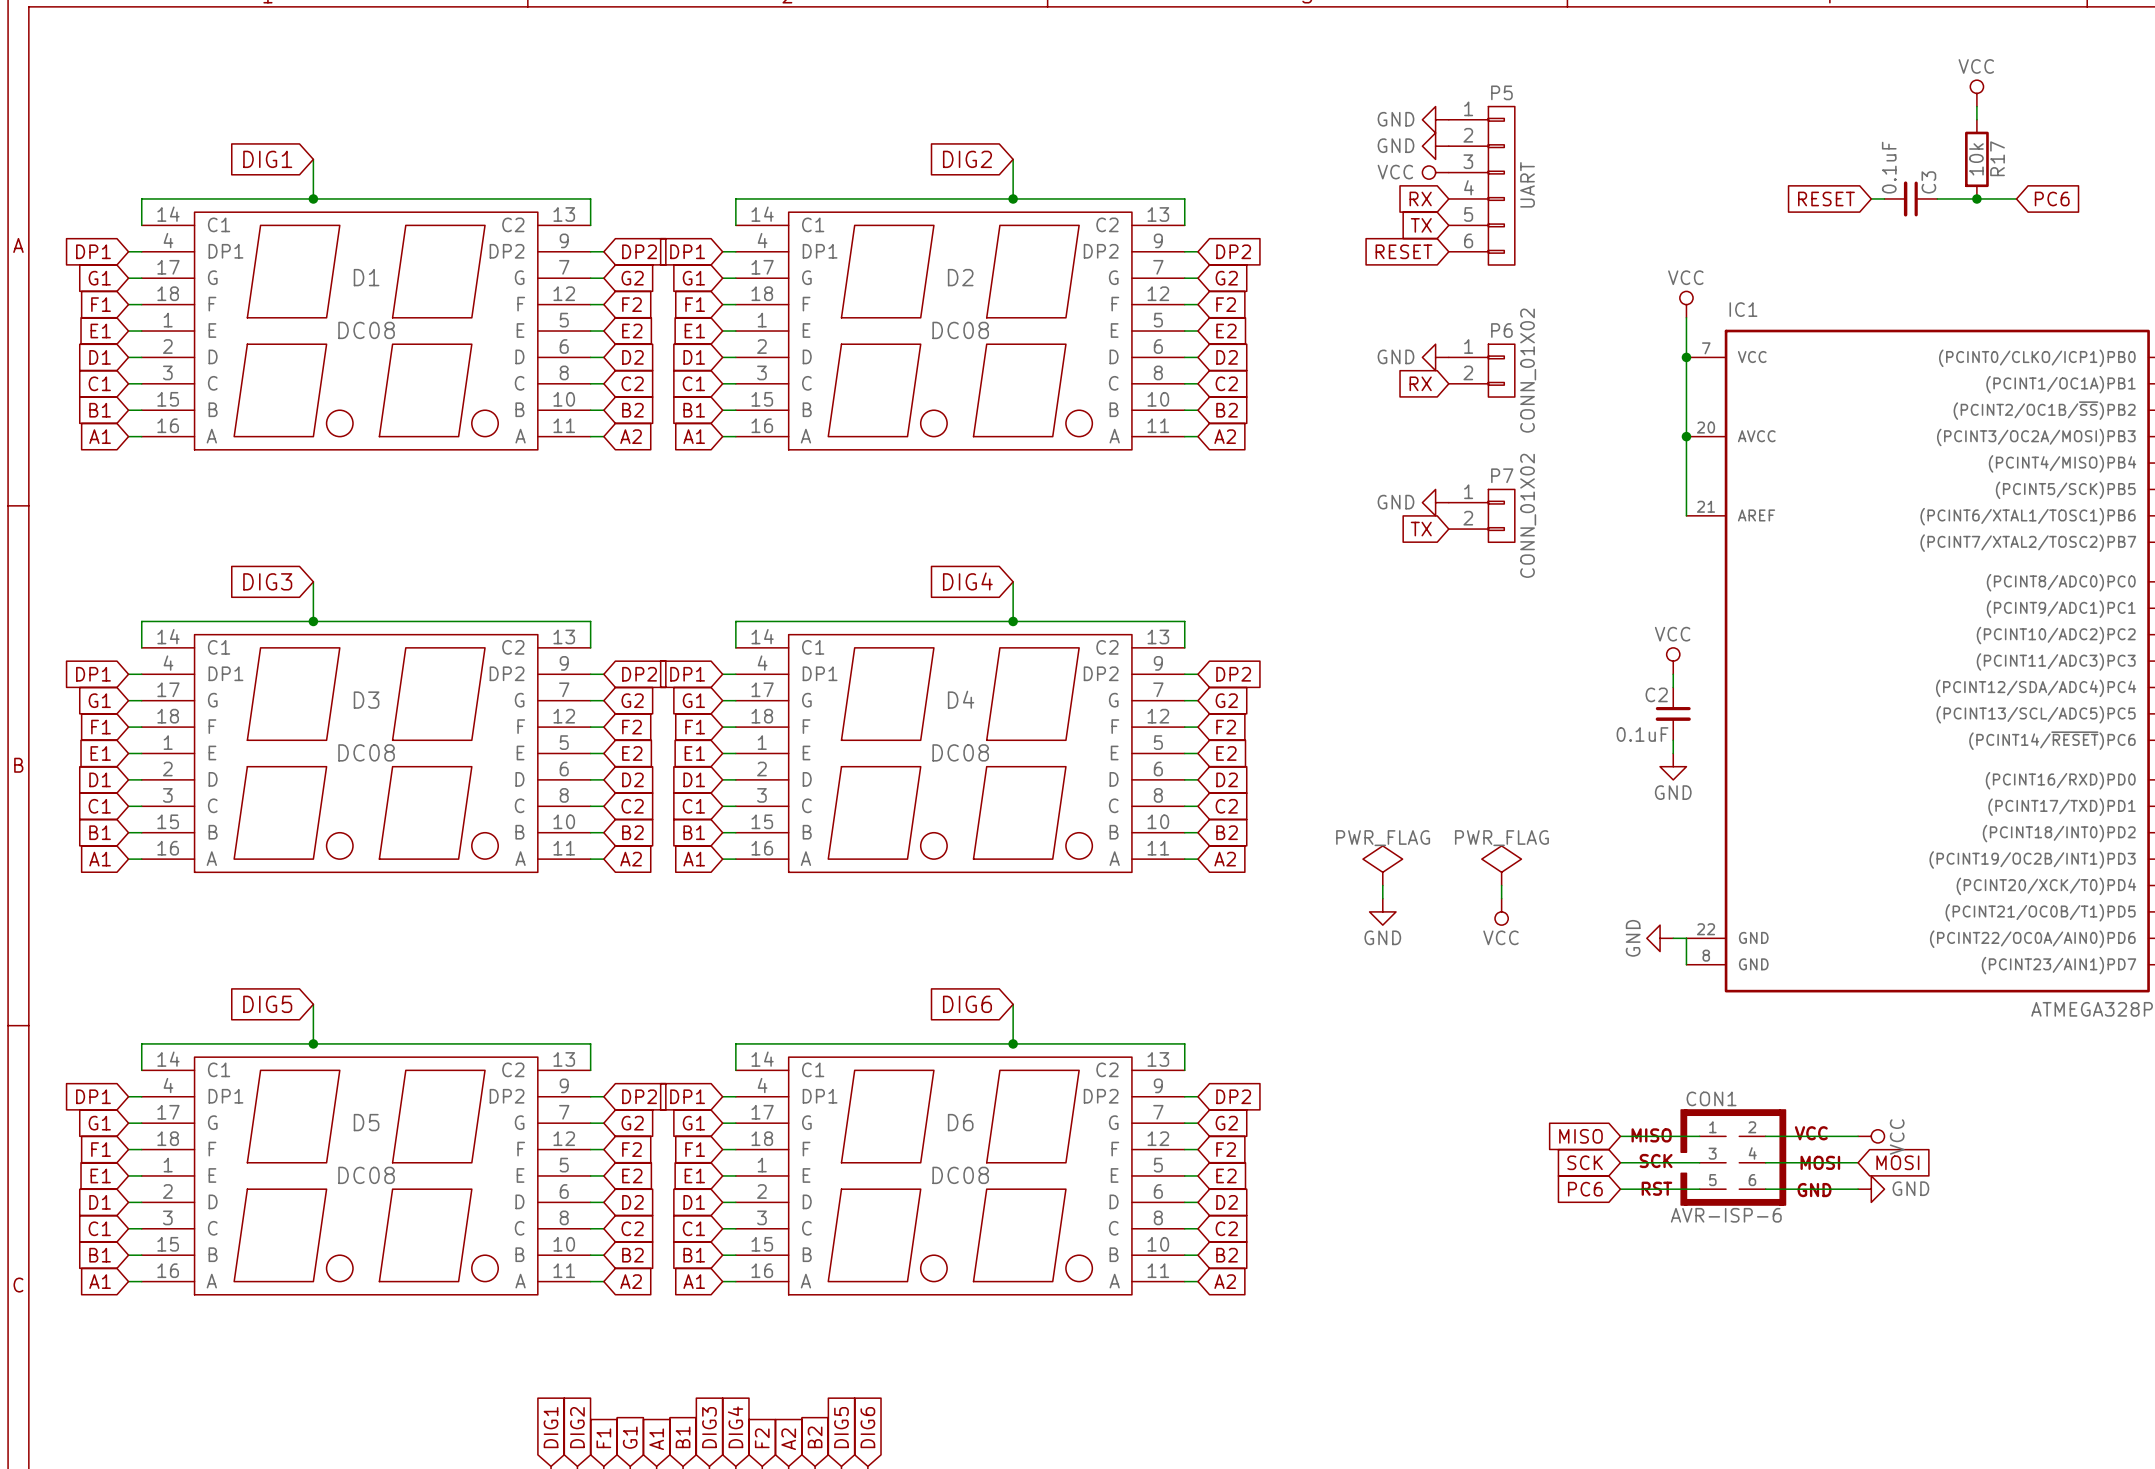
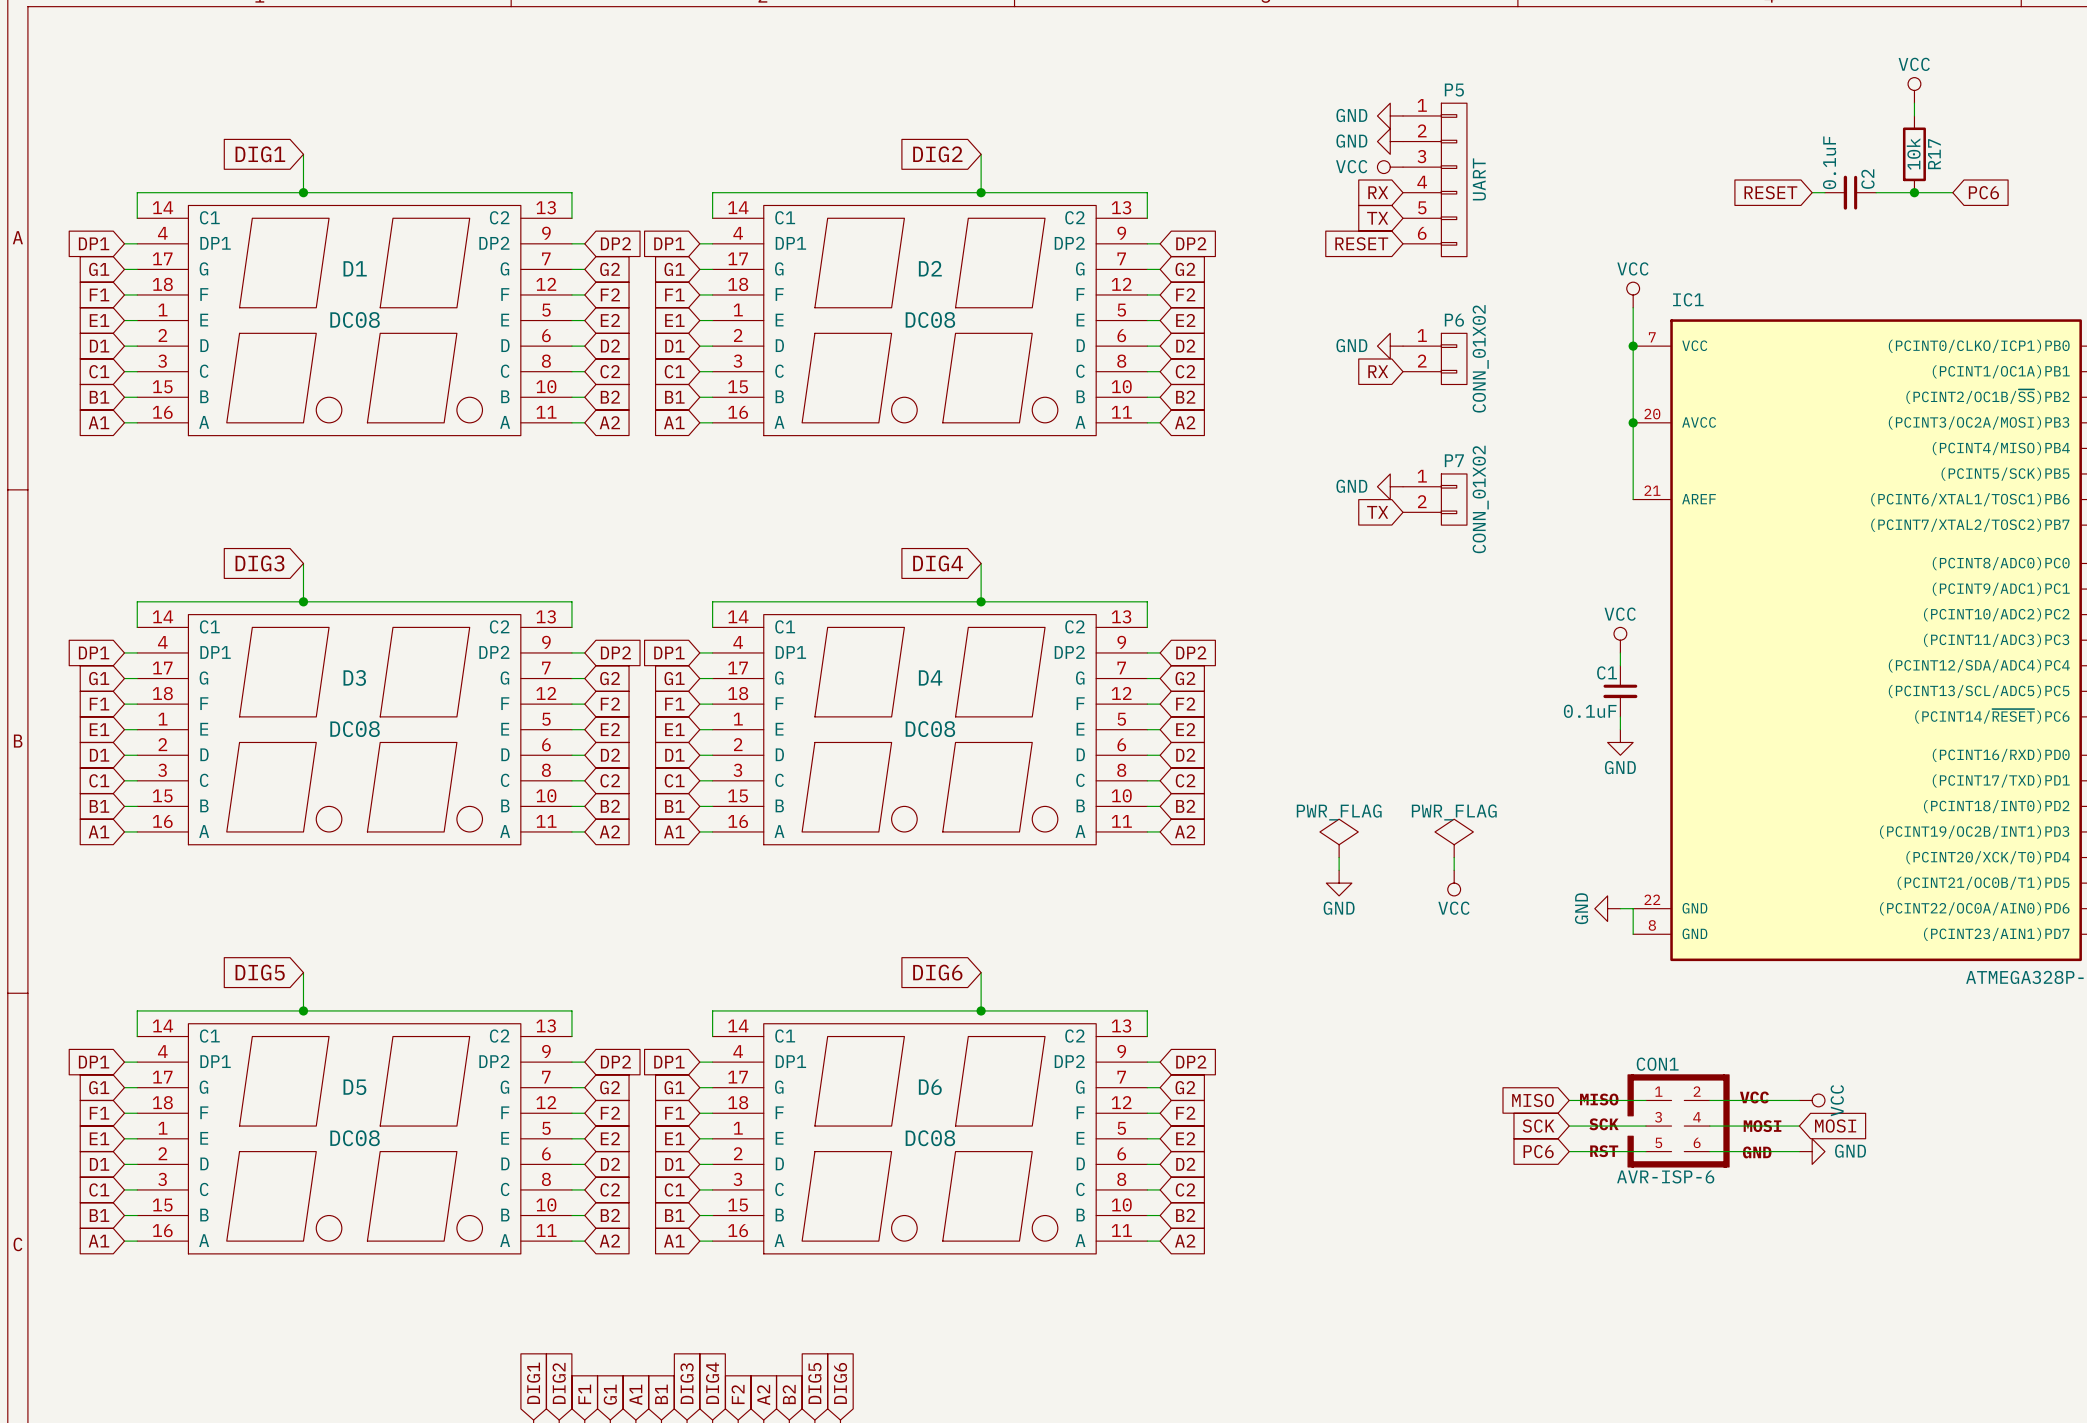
C3 name: C3 (1928, 182) -> C2 (1867, 179)
C2 name: C2 (1656, 694) -> C1 (1607, 672)

